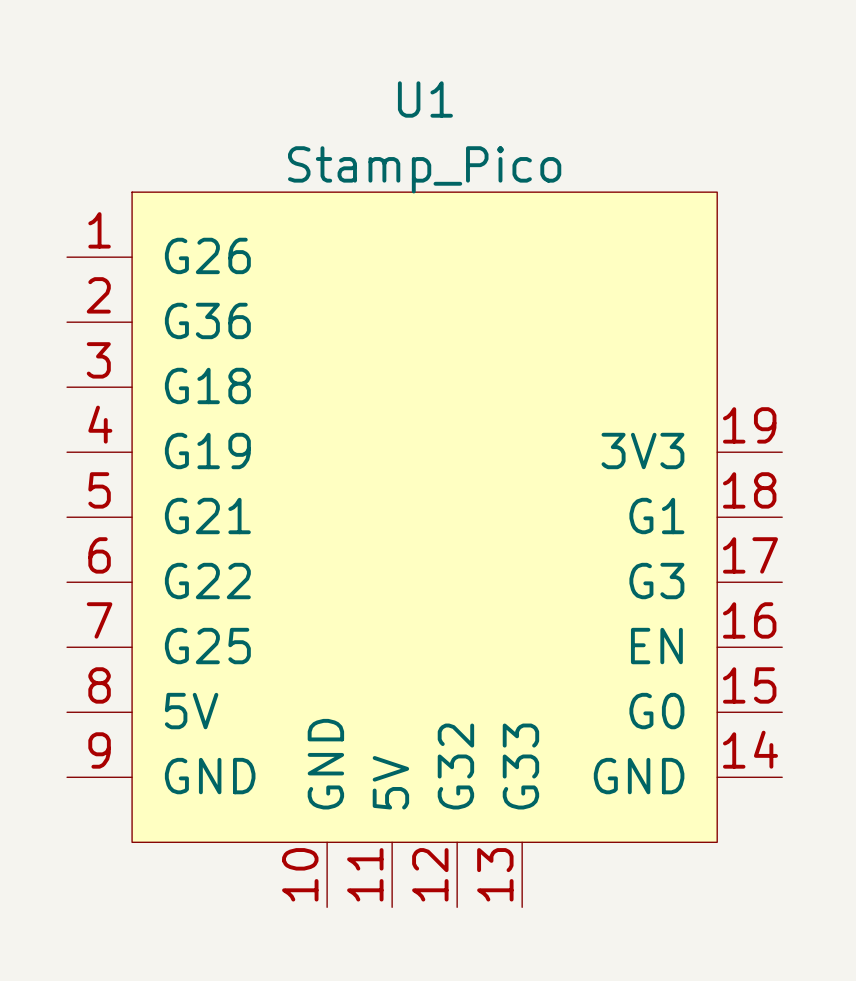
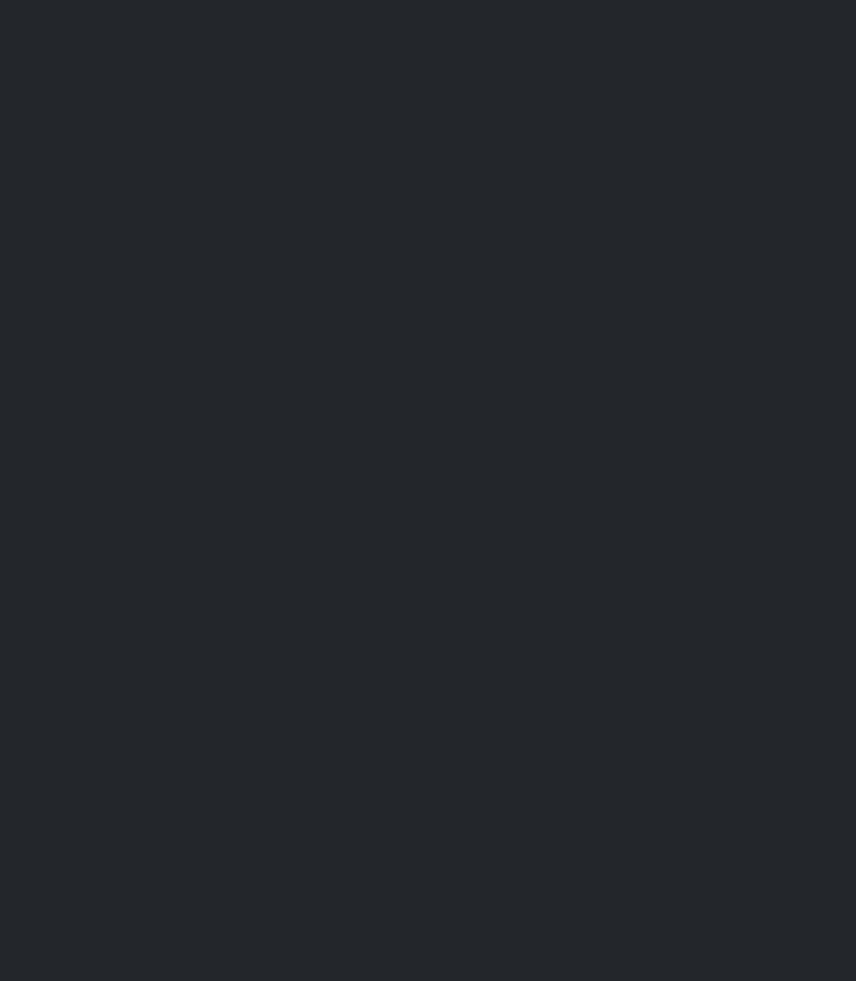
U1: Stamp_Pico (424, 549) -> none

